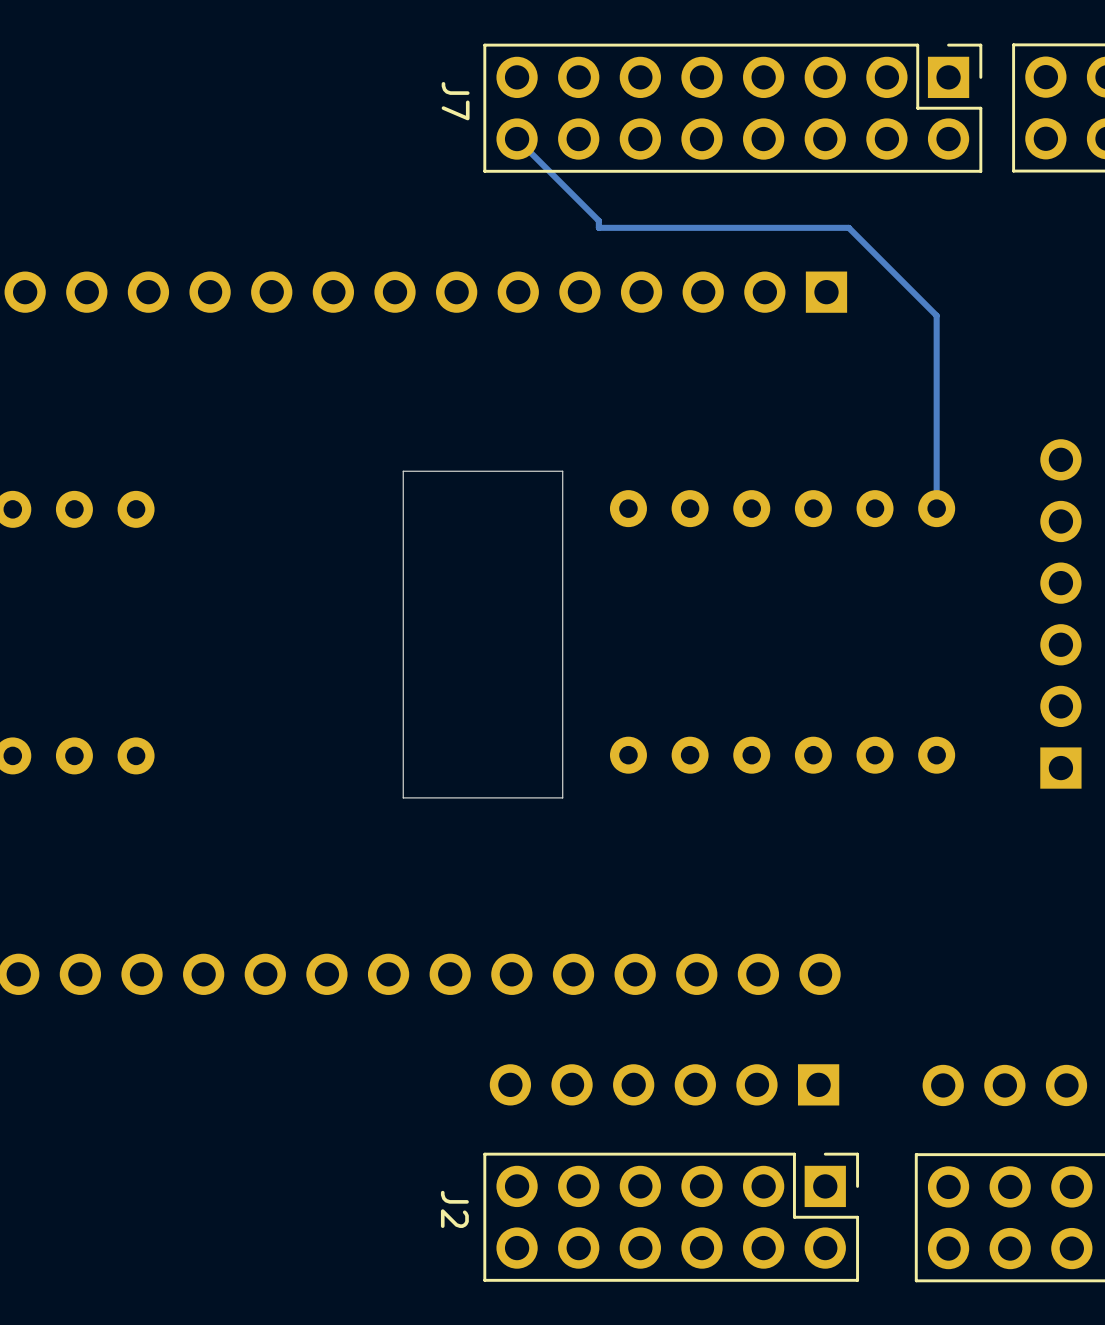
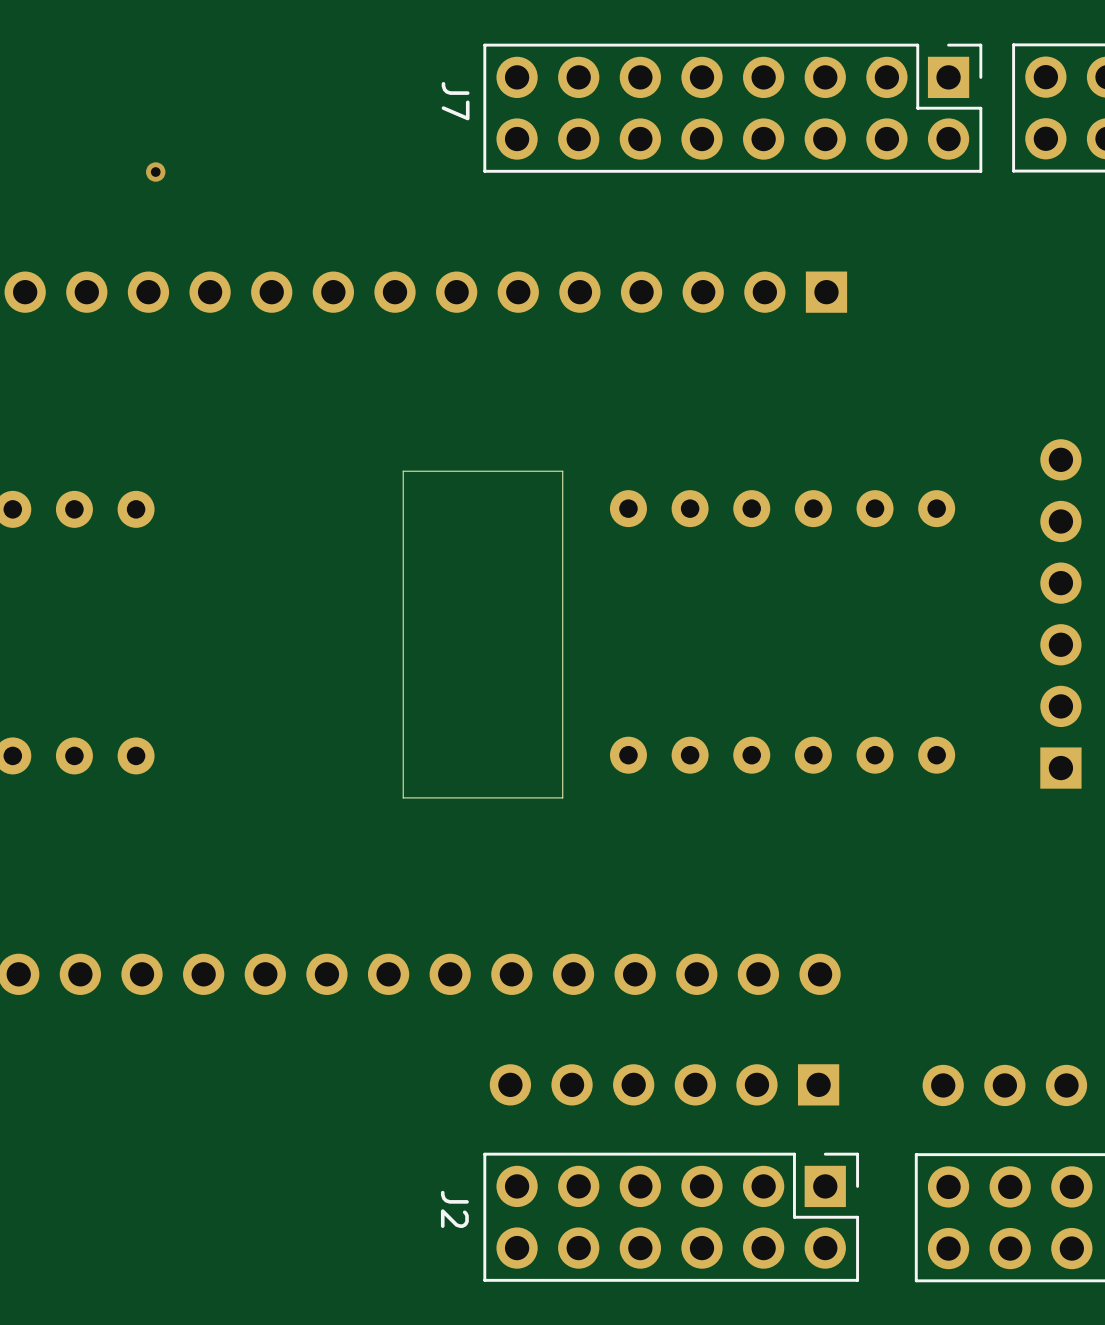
track: (517, 139) (598, 220) (598, 227) (848, 227) (936, 315) (936, 508) -> none
via: none -> (155, 172)

